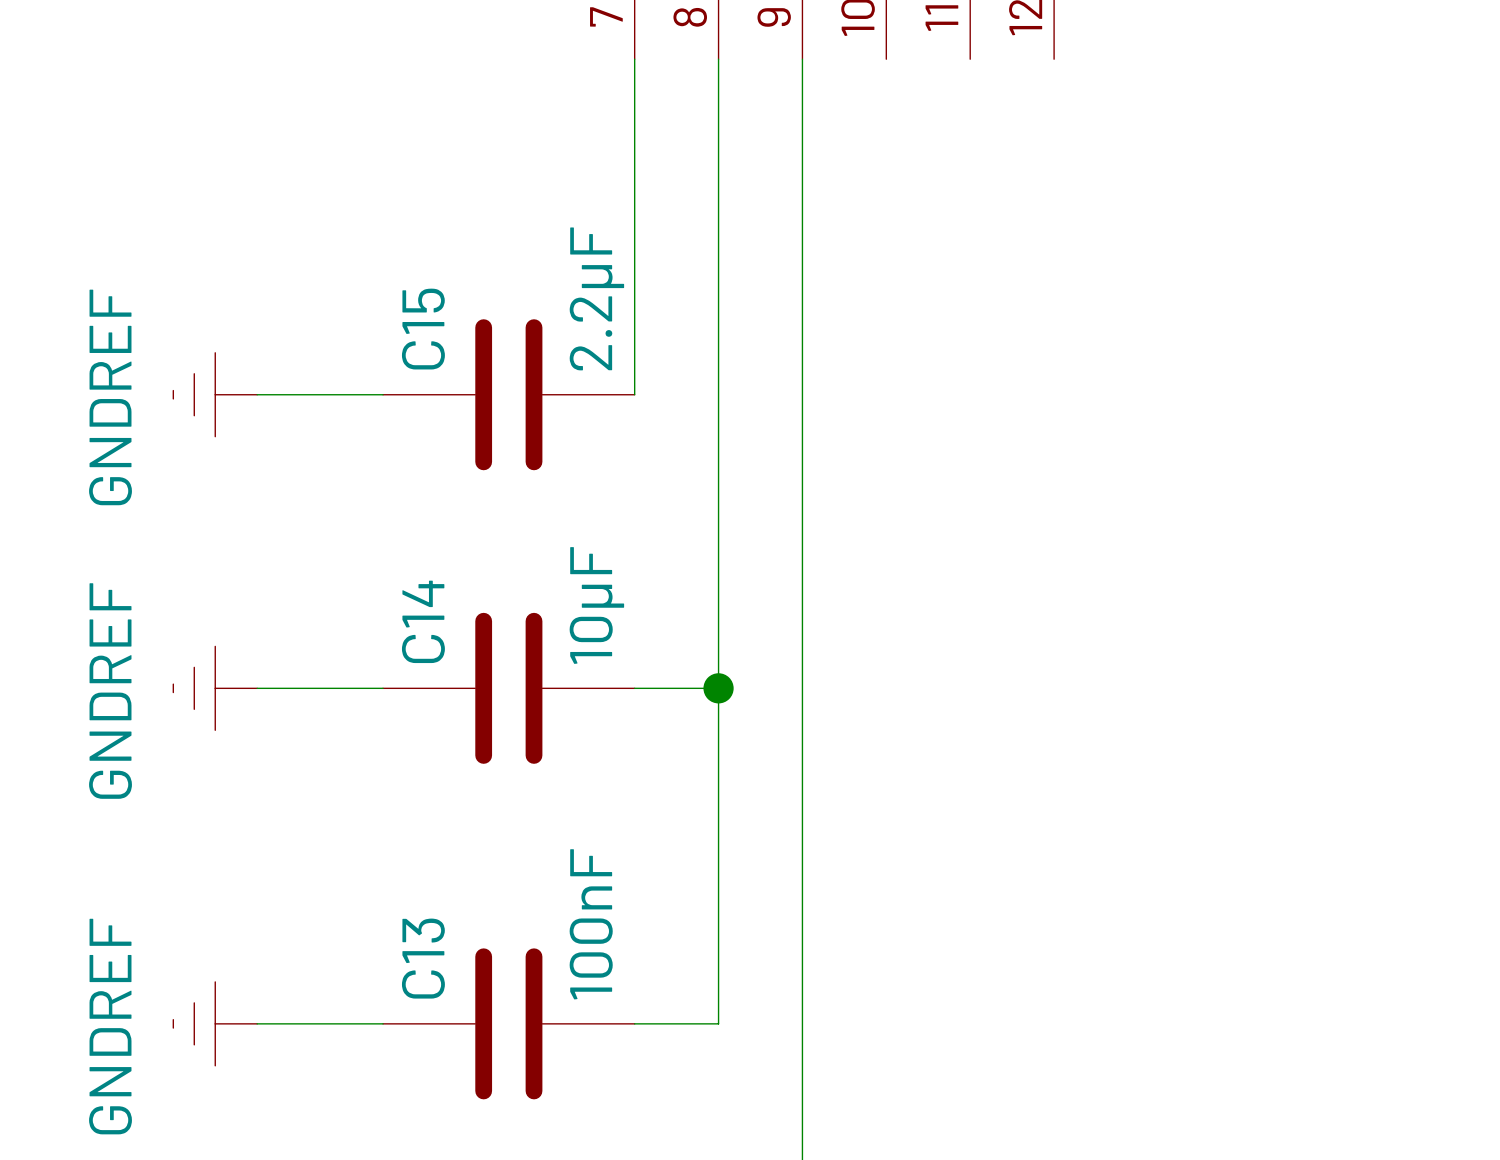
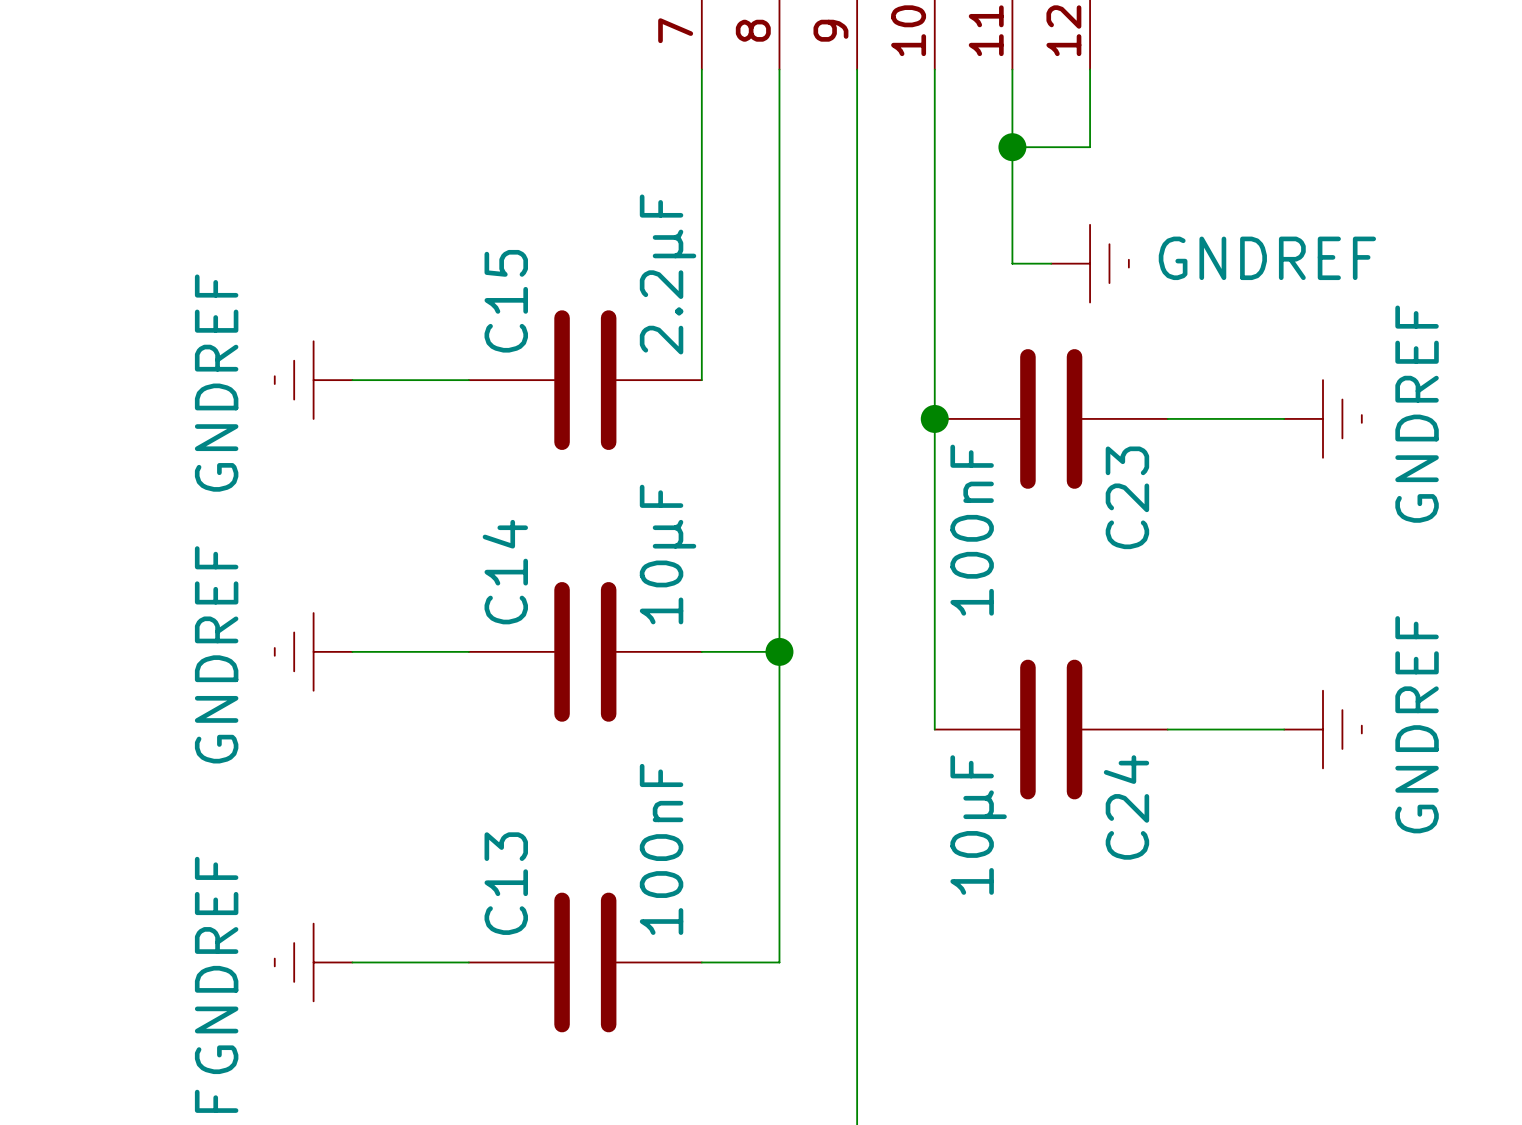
wire: none -> (934, 69) (934, 729)
wire: none -> (1012, 69) (1012, 263) (1051, 263)
wire: none -> (1090, 69) (1090, 147) (1012, 147)
junction: none -> (1012, 147)
power symbol: none -> GNDREF (1090, 263)
junction: none -> (934, 418)
C23: none -> 100nF (1051, 418)
wire: none -> (1167, 418) (1284, 418)
power symbol: none -> GNDREF (1323, 418)
C24: none -> 10µF (1051, 729)
wire: none -> (1167, 729) (1284, 729)
power symbol: none -> GNDREF (1323, 729)

